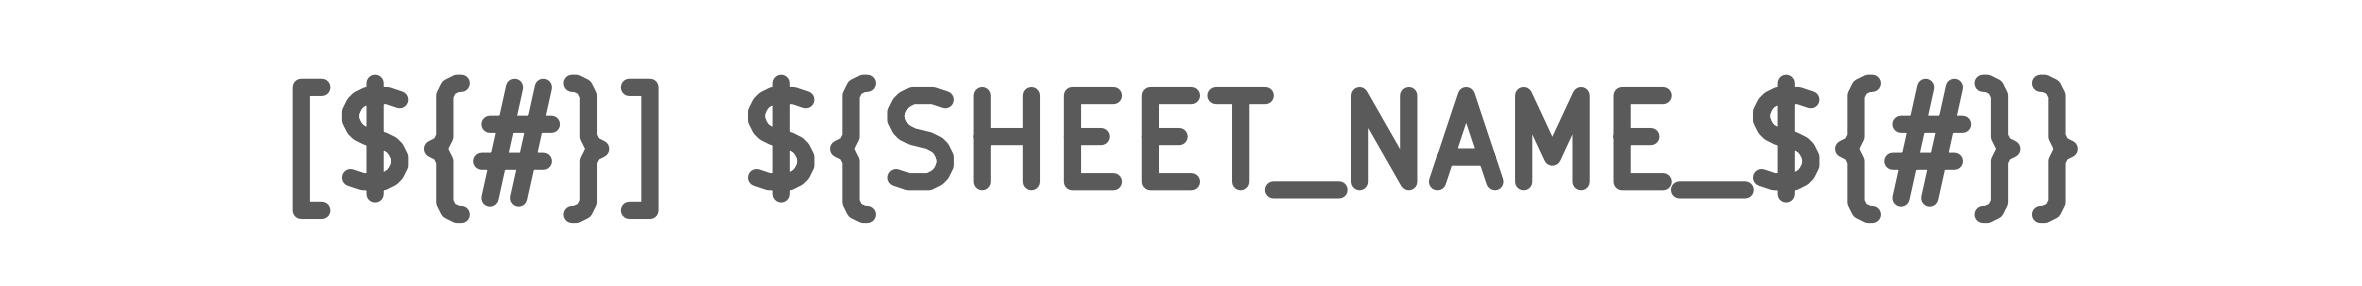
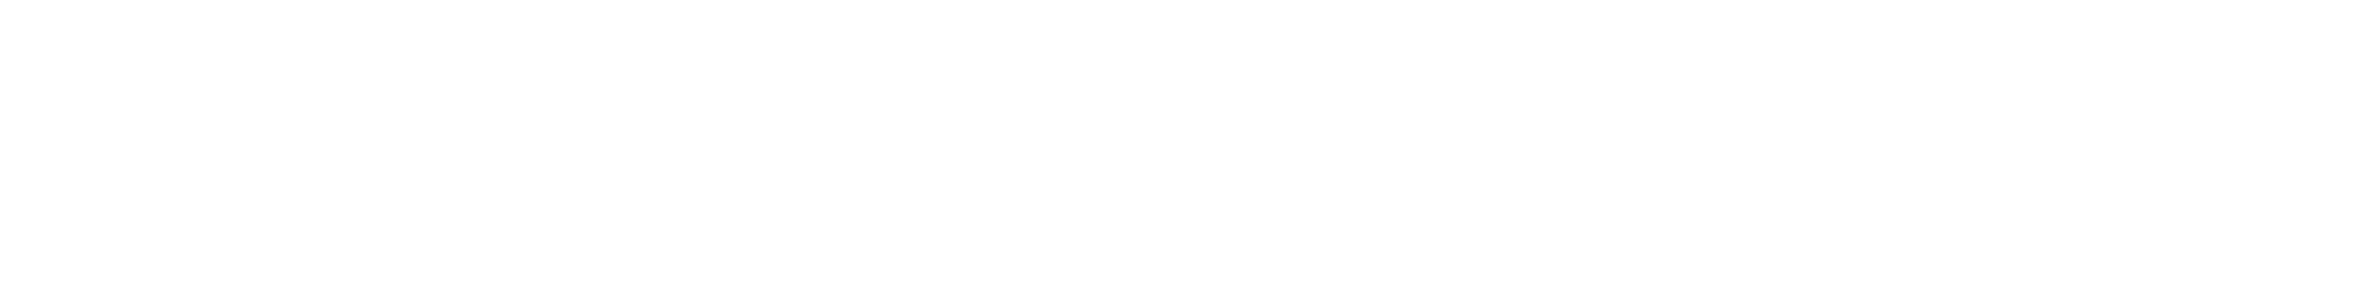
text: [${#}] ${SHEET_NAME_${#}} (1185, 148) -> none

